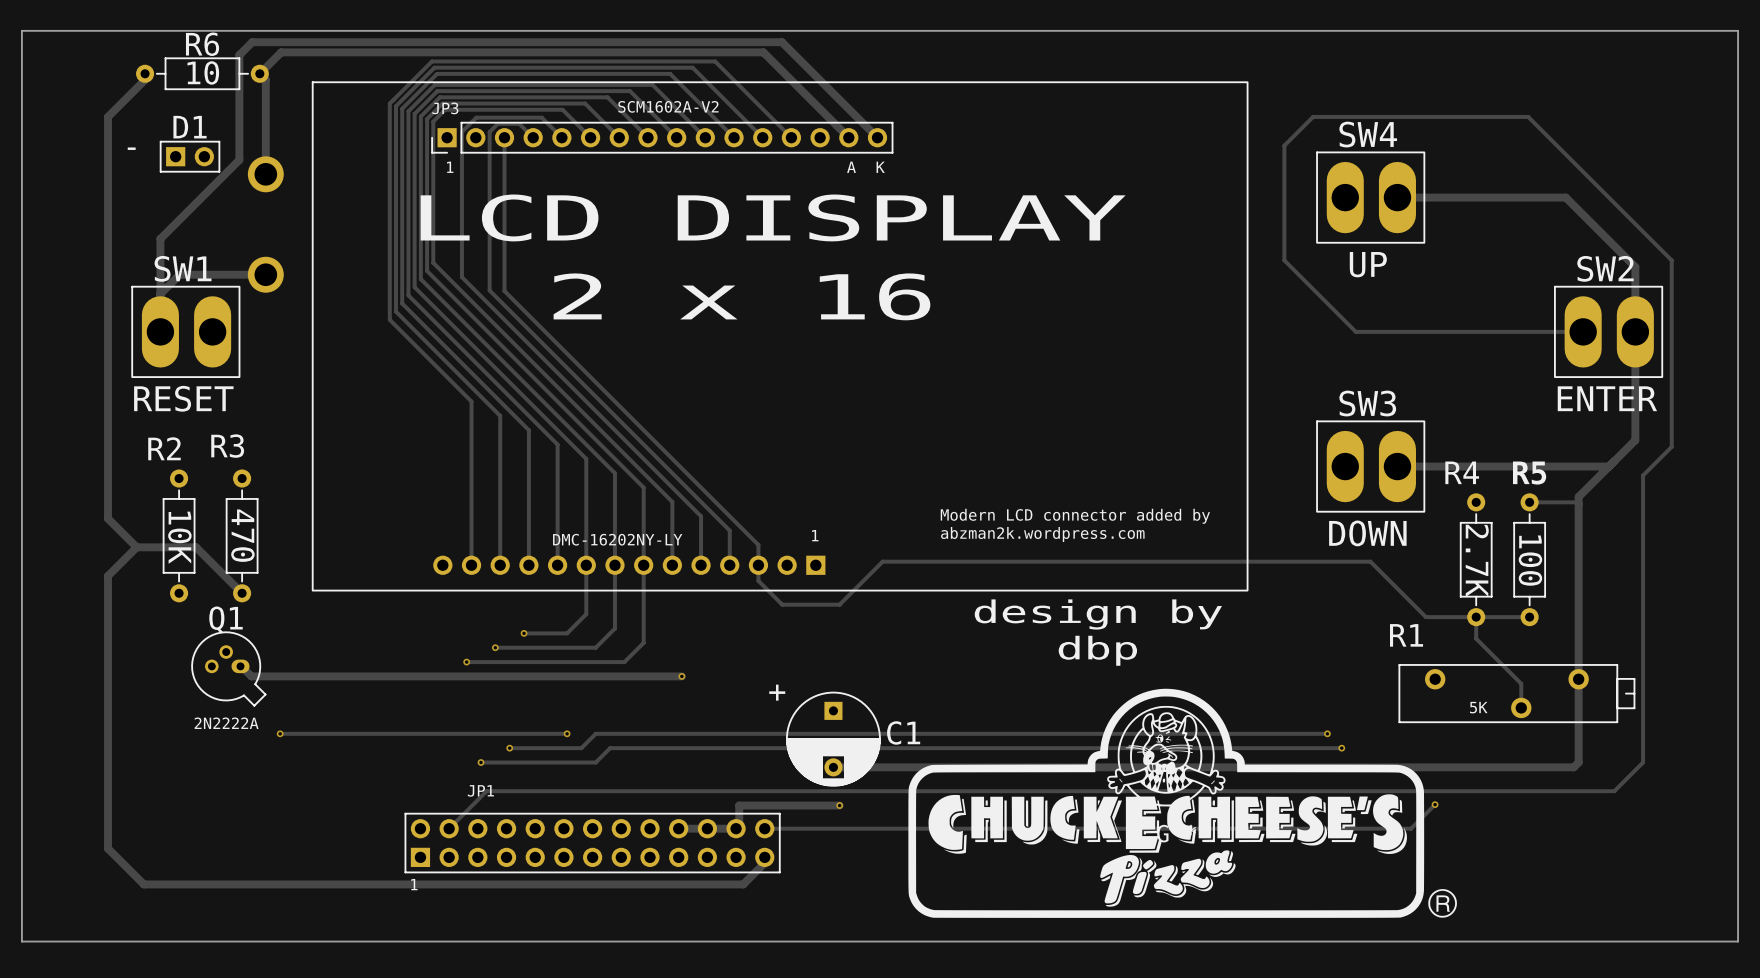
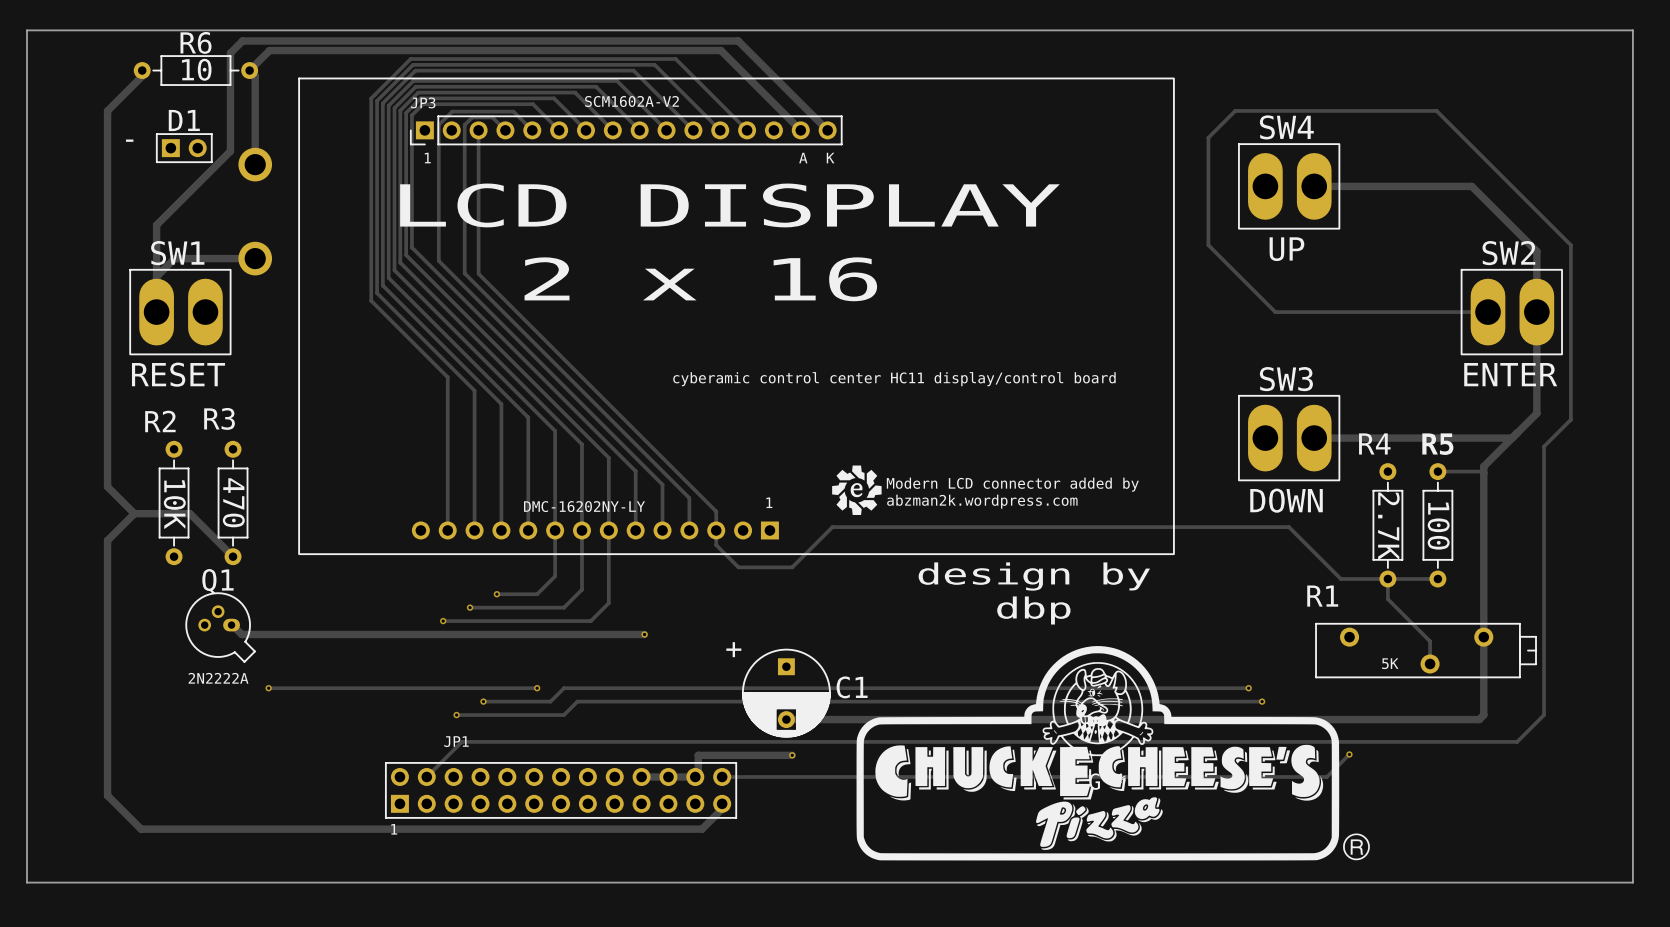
text: none -> cyberamic control center HC11 display/control board (894, 379)
drawing: none -> [832, 465, 882, 515]

